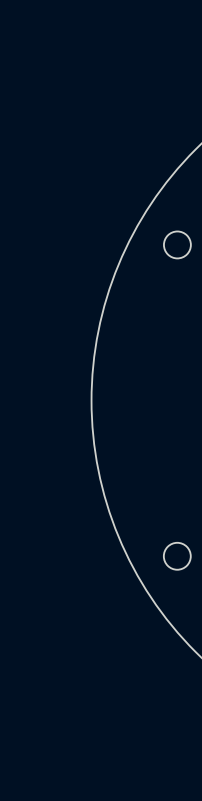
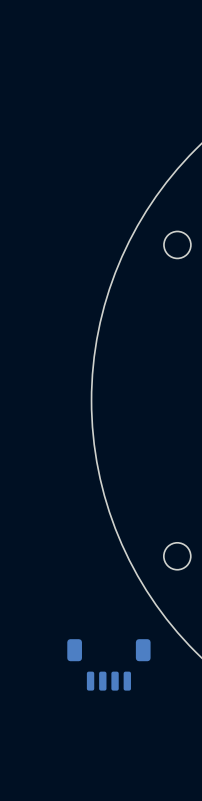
part: none -> (108, 664)

